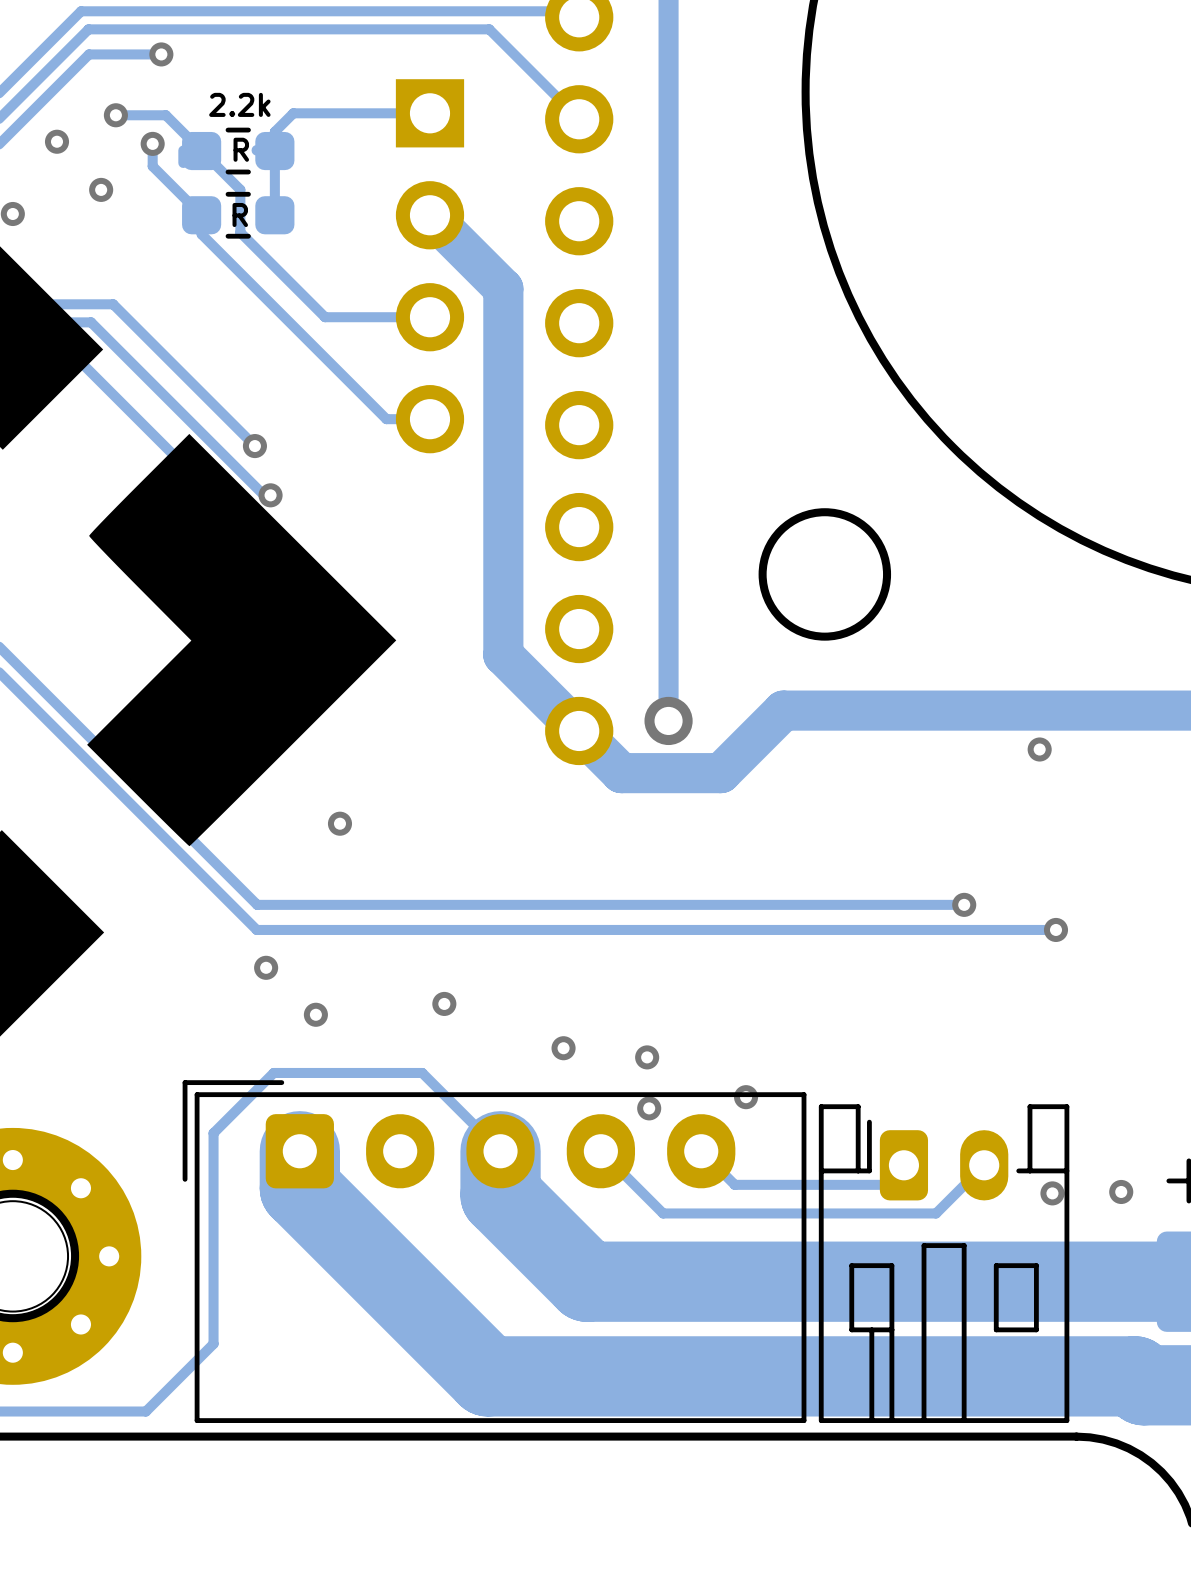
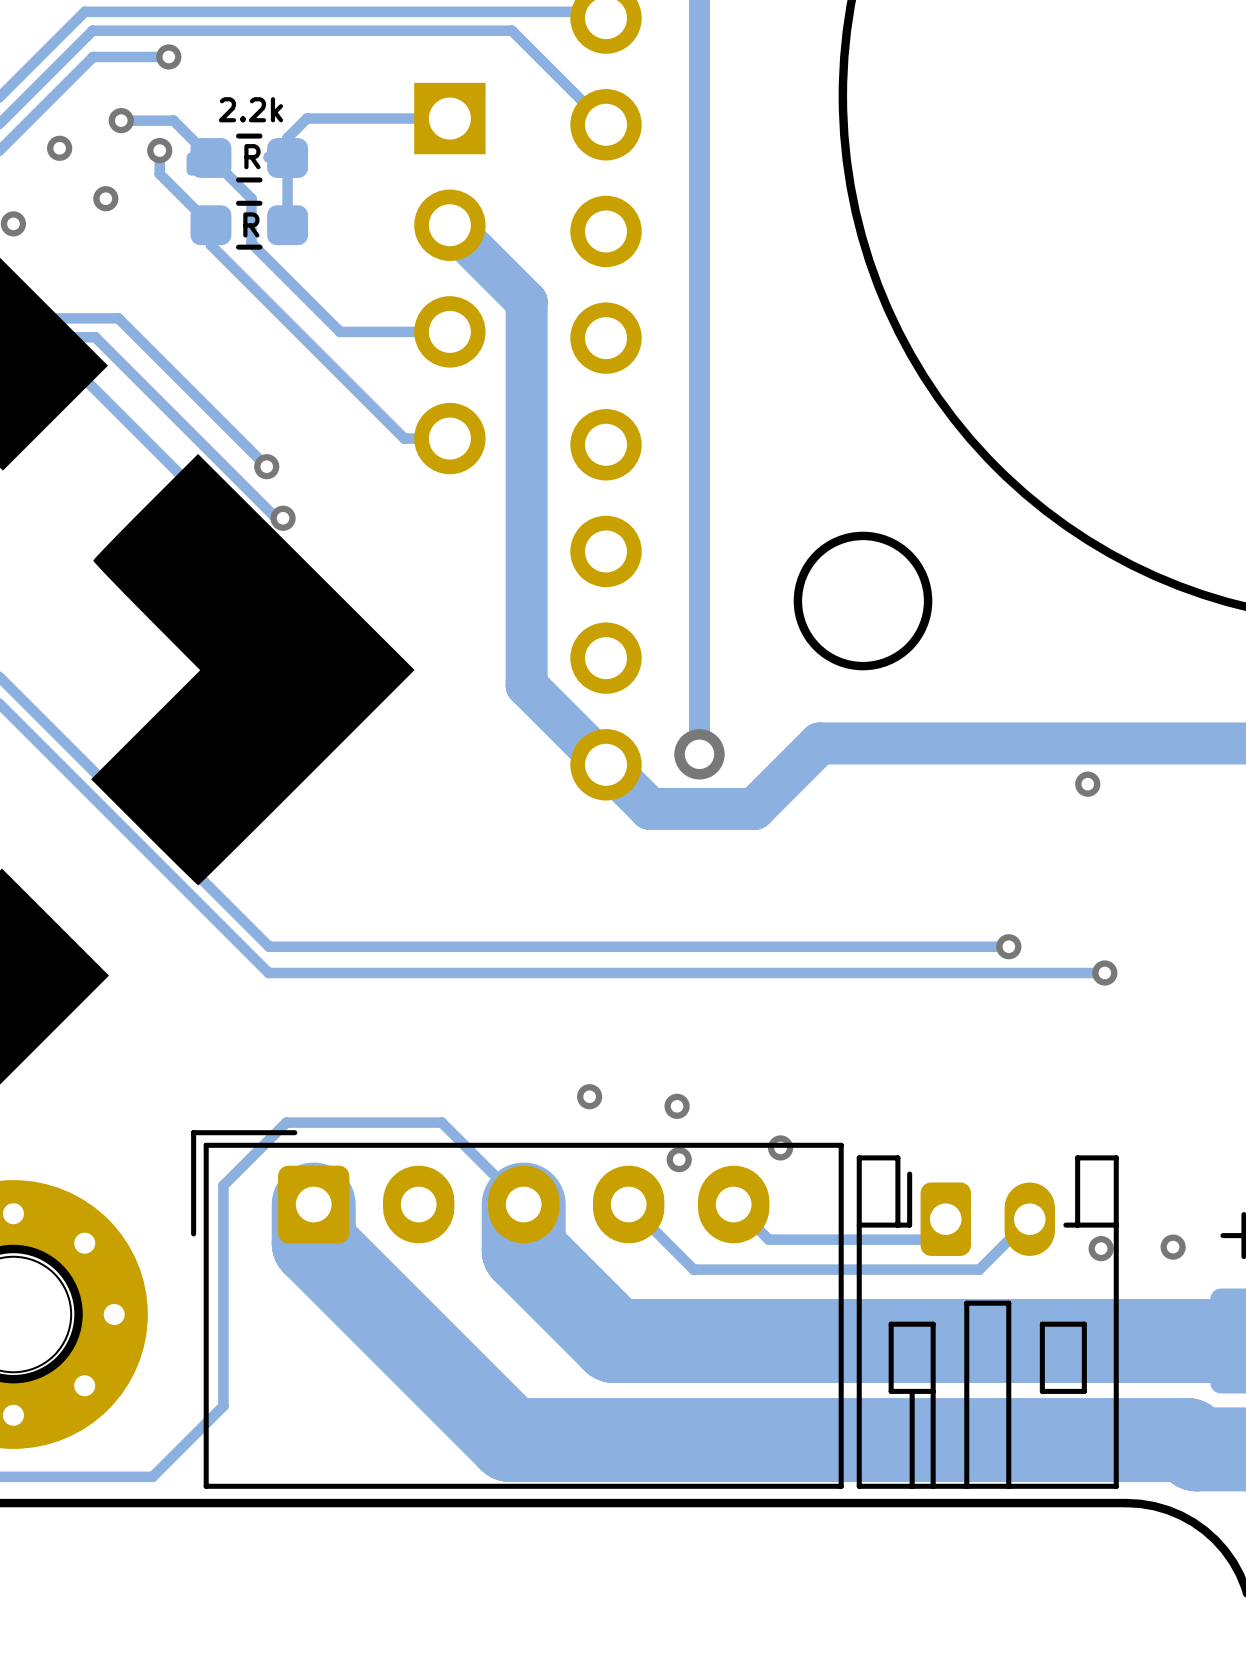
via: (339, 823) -> none
via: (266, 967) -> none
via: (444, 1003) -> none
via: (315, 1014) -> none

